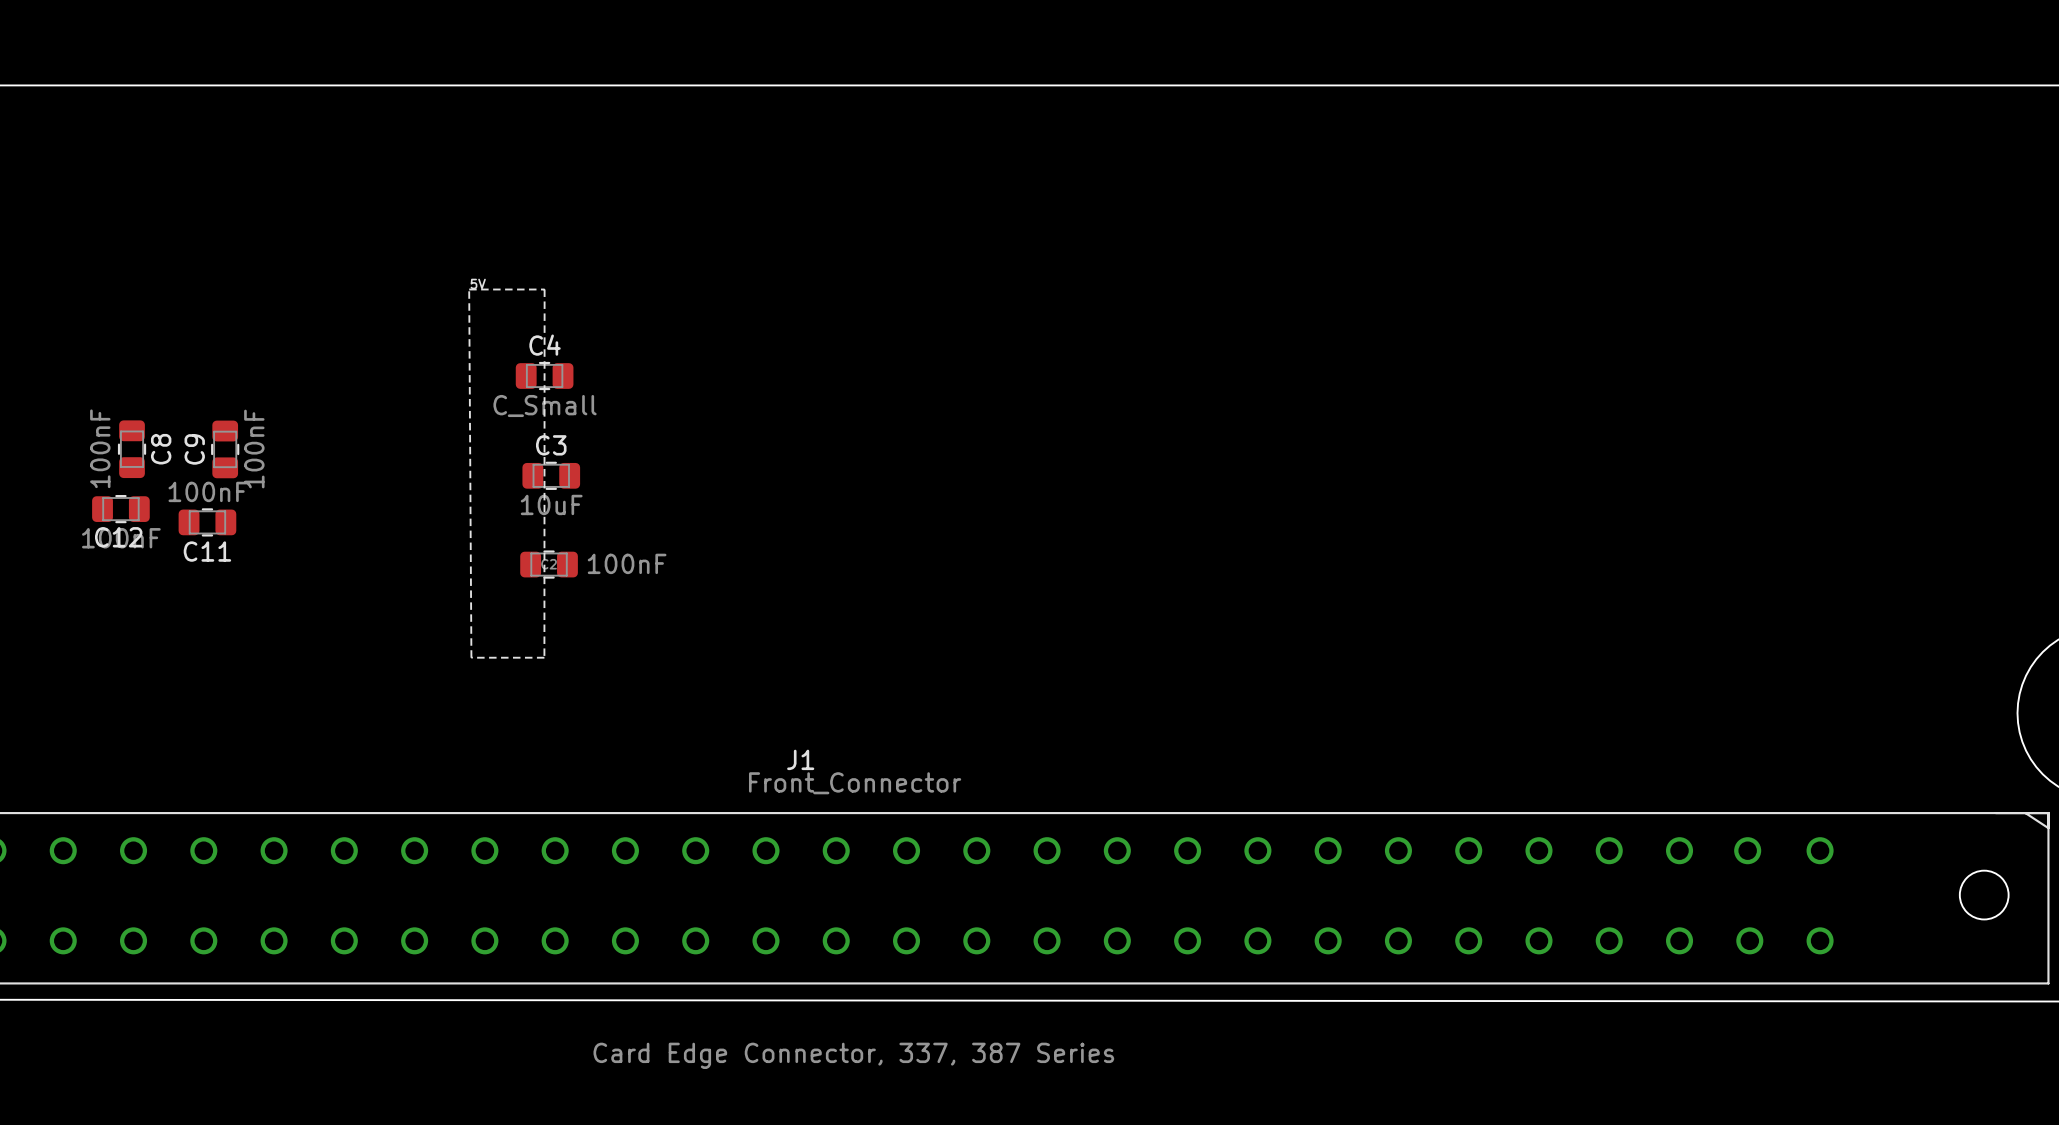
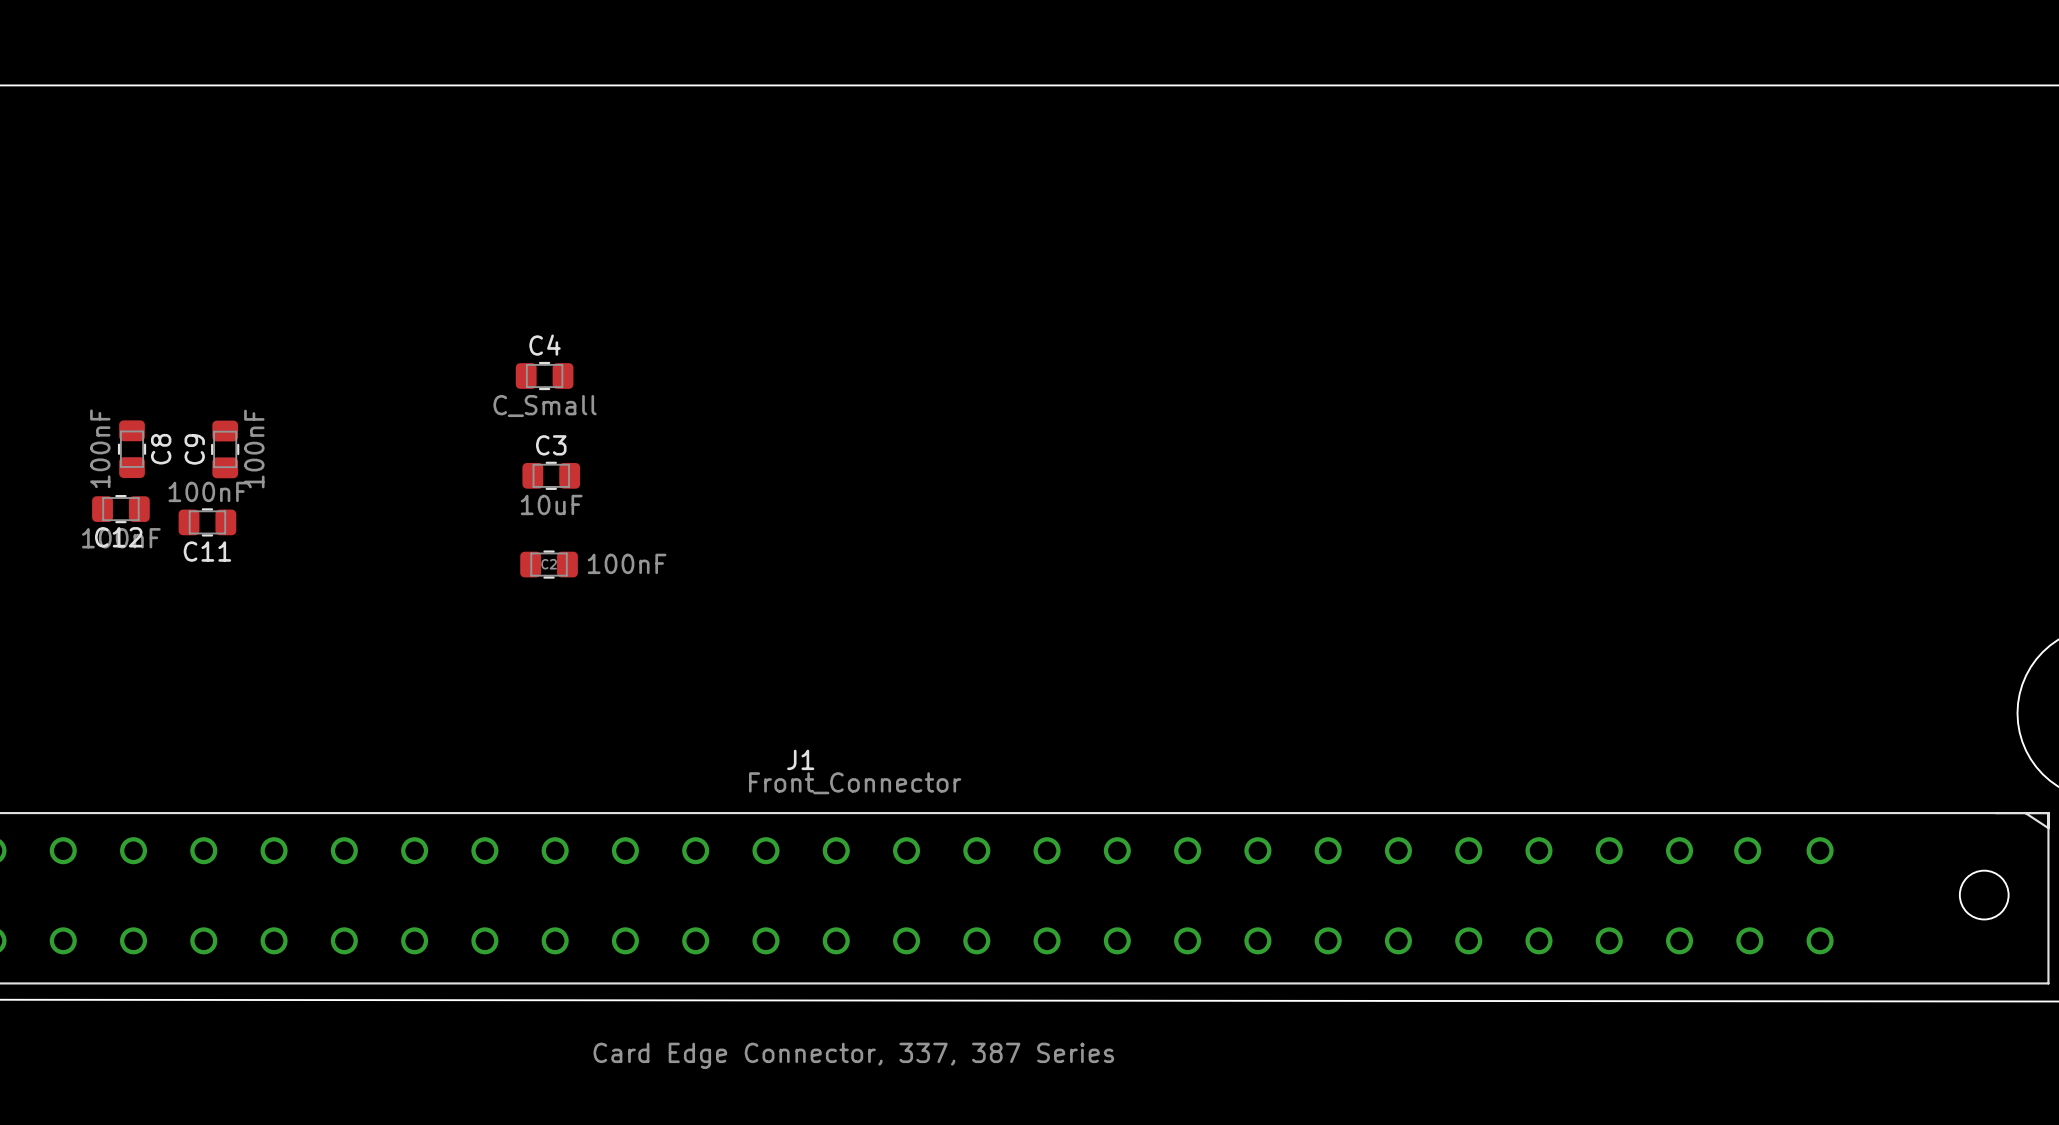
text: 5V (478, 283) -> none
line: (469, 289) (544, 289) (544, 657) (471, 657) (469, 289) -> none

